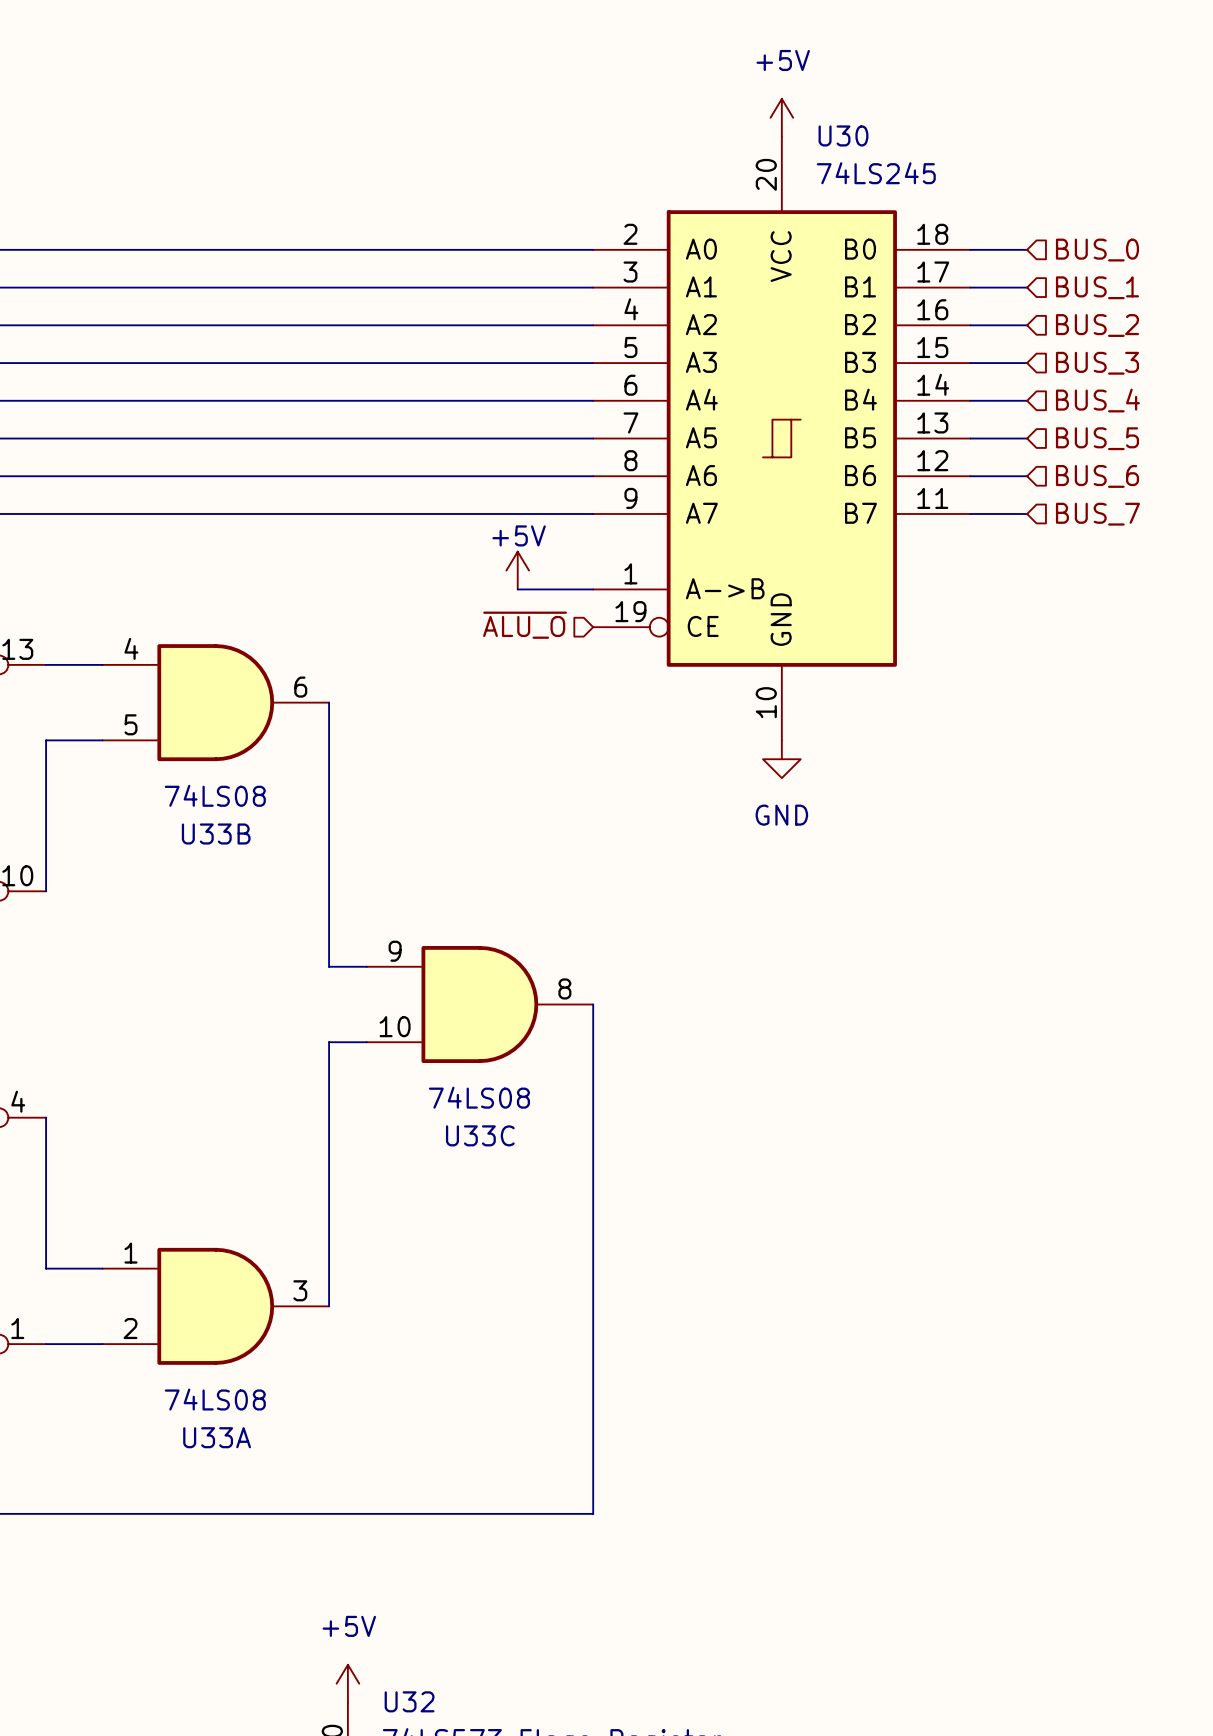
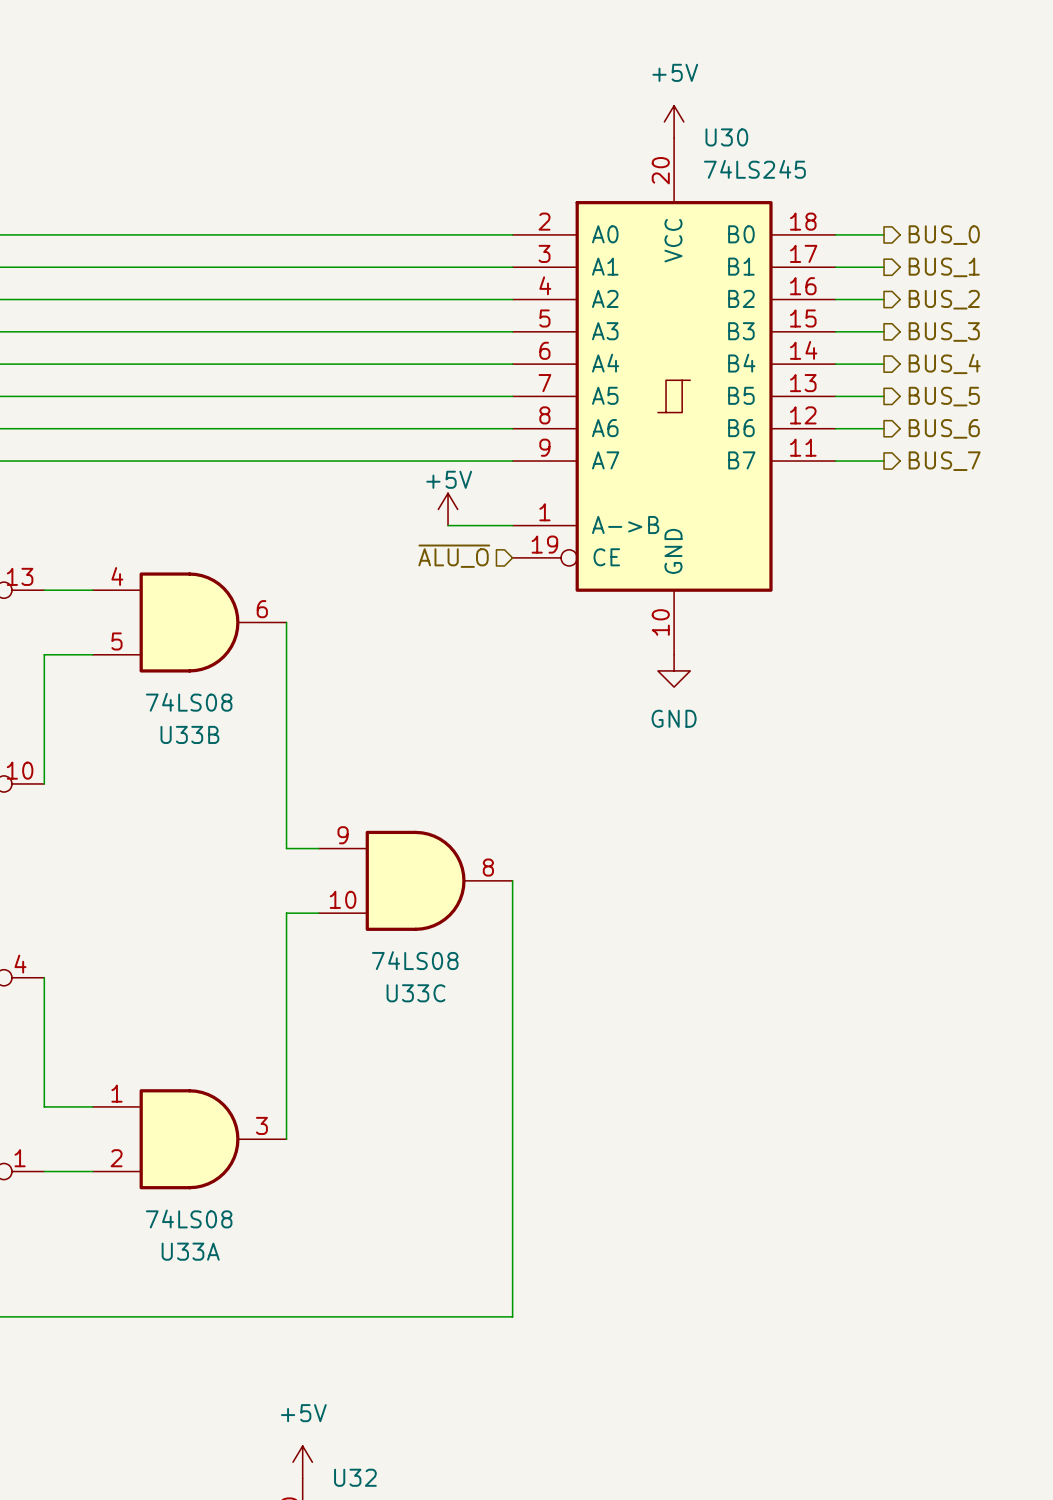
hierarchical label shape: input (1097, 250) -> output (944, 235)
hierarchical label shape: input (1097, 287) -> output (944, 267)
hierarchical label shape: input (1097, 325) -> output (944, 299)
hierarchical label shape: input (1097, 363) -> output (944, 331)
hierarchical label shape: input (1097, 400) -> output (944, 363)
hierarchical label shape: input (1097, 438) -> output (944, 396)
hierarchical label shape: input (1097, 476) -> output (944, 428)
hierarchical label shape: input (1097, 514) -> output (944, 461)

